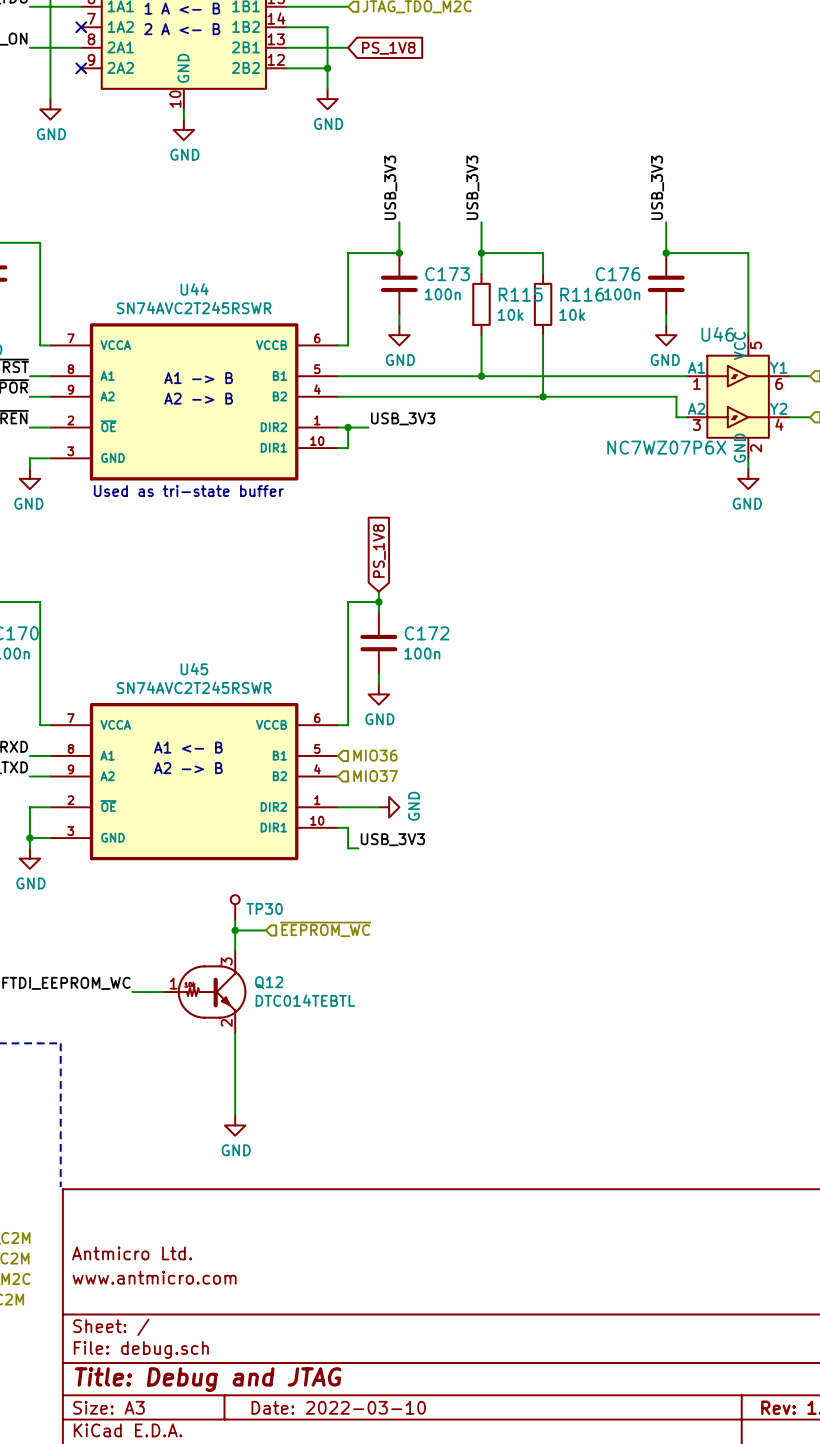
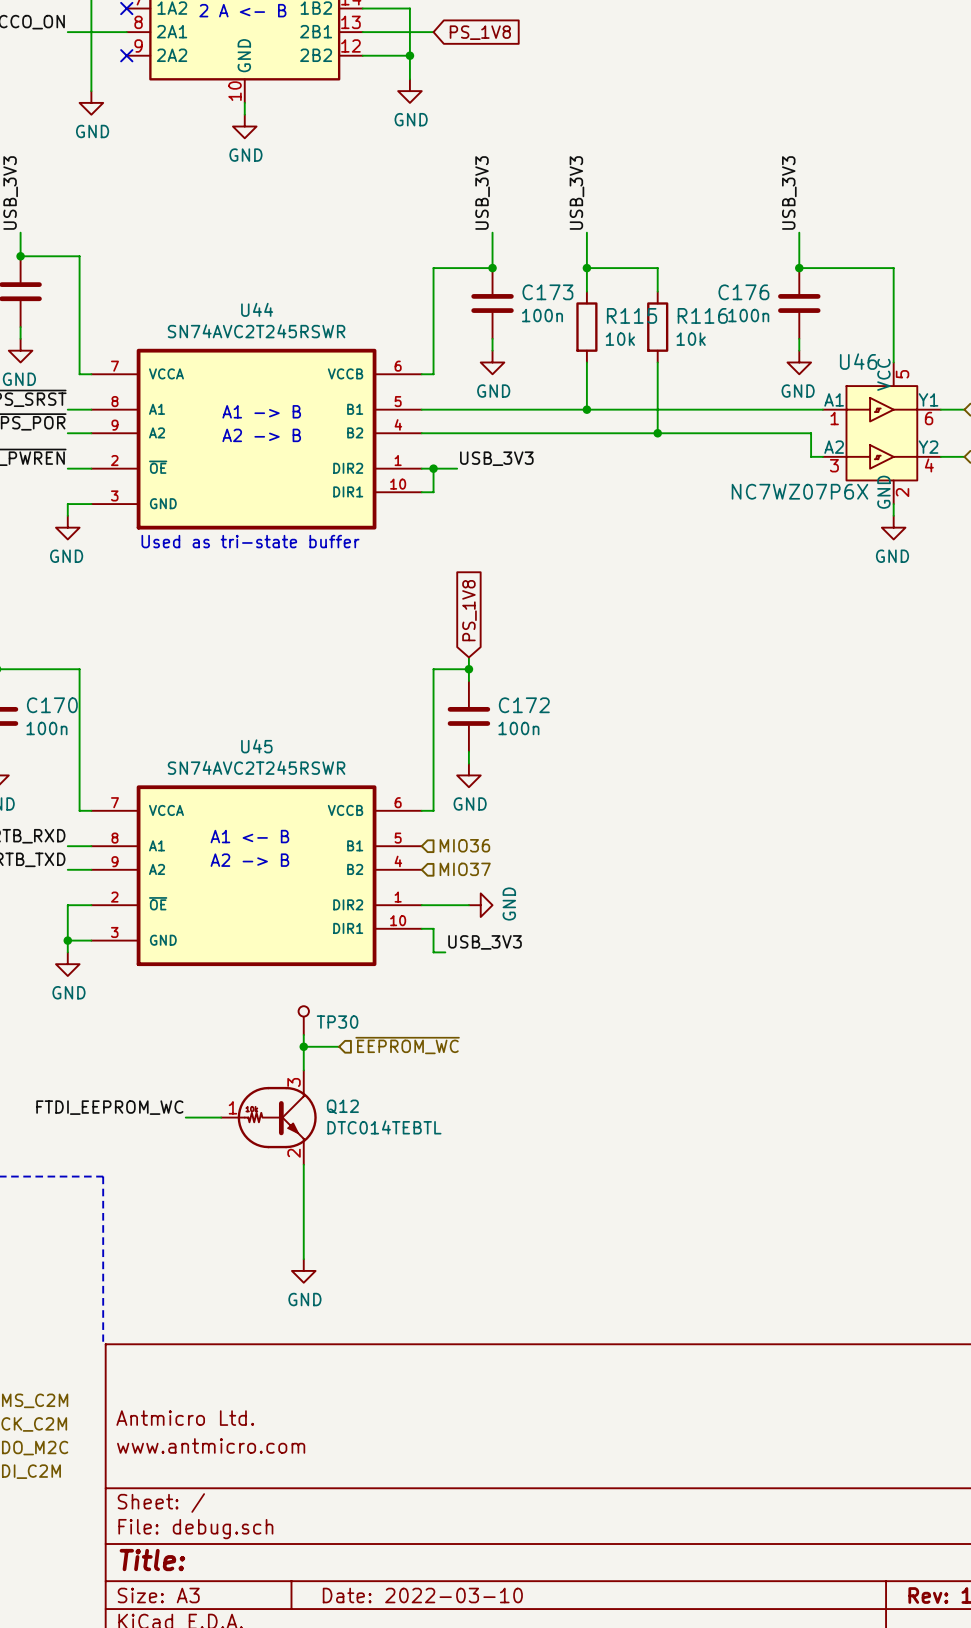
title block: Title: Debug and JTAG (208, 1379) -> Title: (152, 1560)

